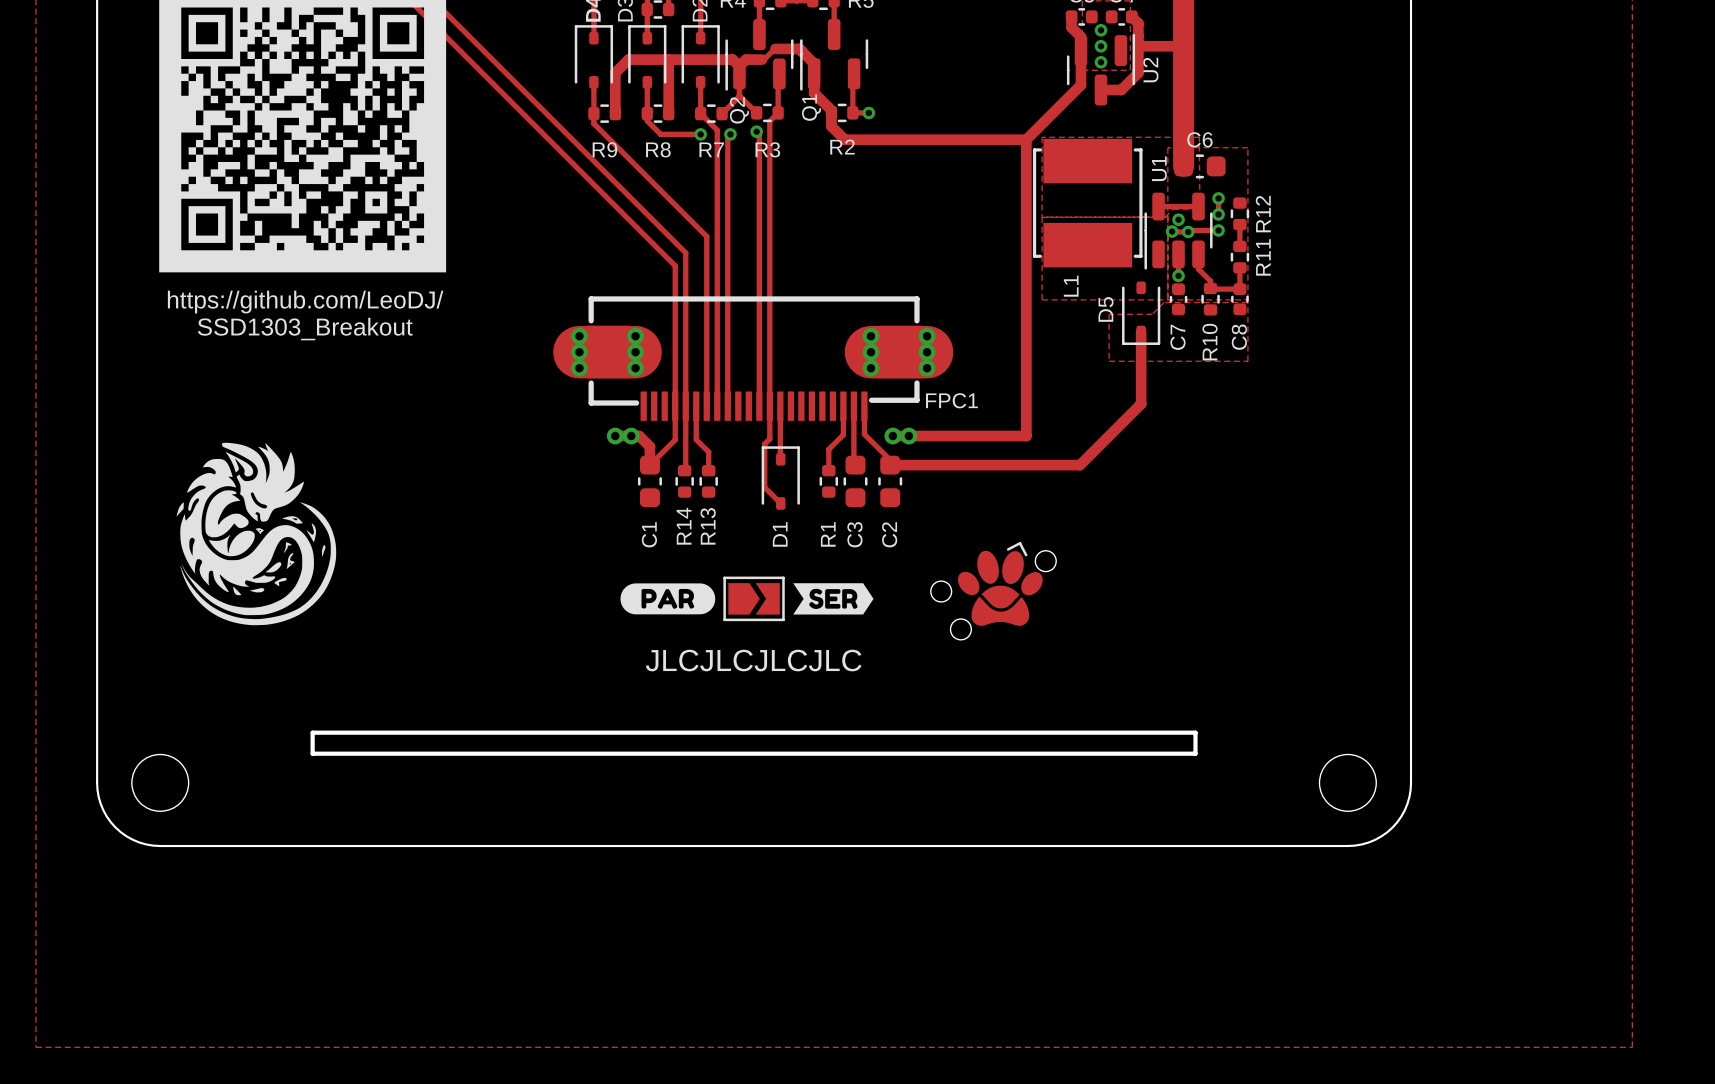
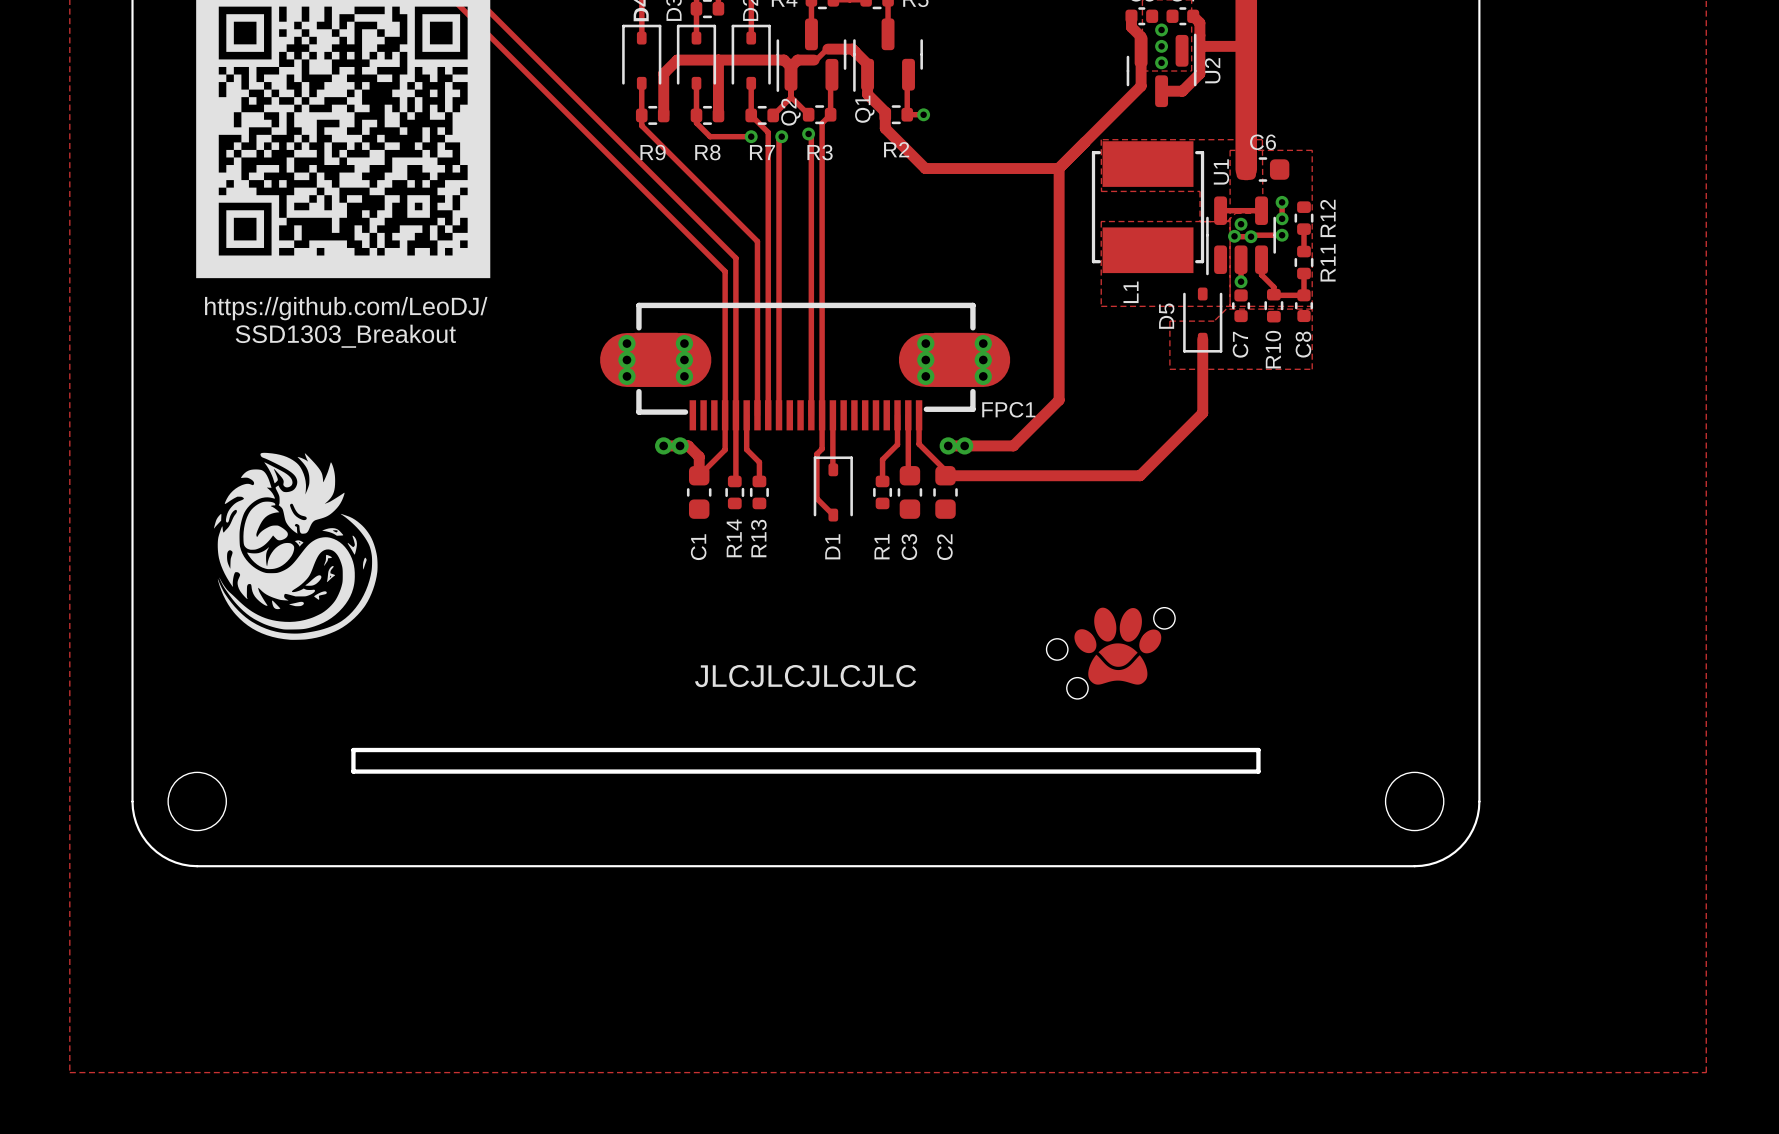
zone outline: (1042, 137) (1042, 217) -> none
track: (844, 139) (1026, 139) (1026, 436) (956, 436) -> (1059, 168) (1059, 400) (1013, 445)
track: none -> (898, 142) (925, 168) (1058, 168) (1085, 142)
zone outline: (1165, 217) (1042, 217) -> (1227, 221) (1200, 221) (1200, 191) (1101, 191) (1101, 139)
drawing: [620, 583, 716, 615] -> none
drawing: [793, 583, 874, 615] -> none
part: (993, 590) -> none
part: (754, 598) -> none
part: none -> (1110, 653)

